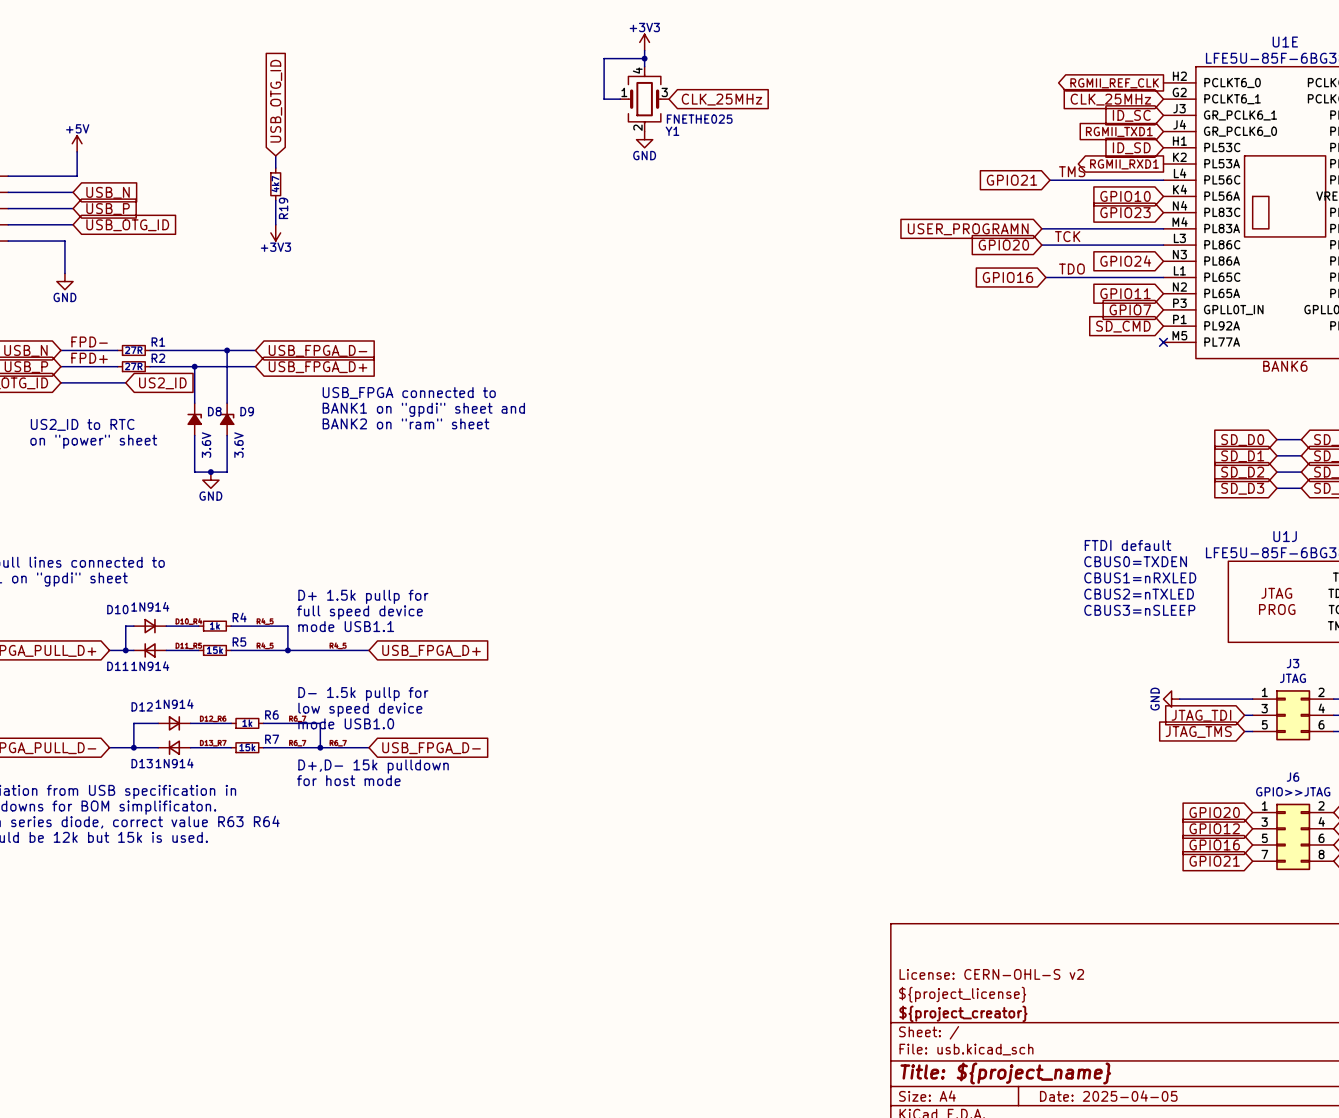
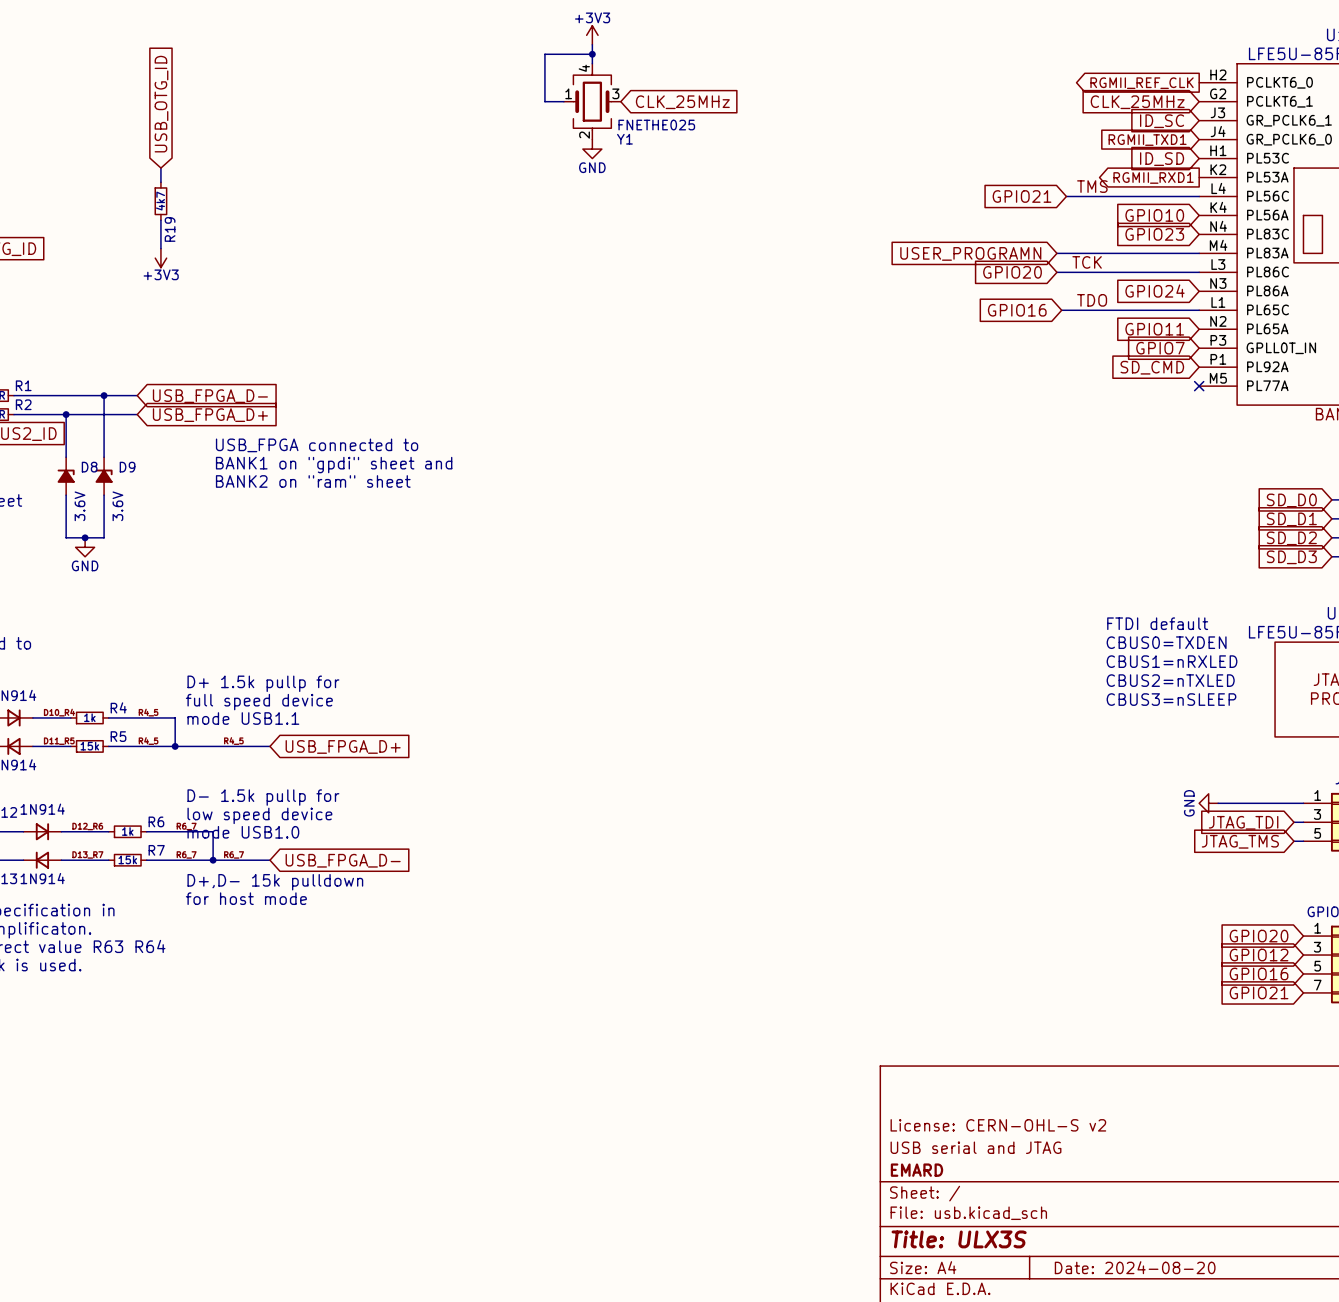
title block: ${project_license} (962, 994) -> USB serial and JTAG (975, 1147)
title block: ${project_creator} (963, 1013) -> EMARD (916, 1170)
title block: Title: ${project_name} (1005, 1073) -> Title: ULX3S (959, 1239)
title block: Date: 2025-04-05 (1108, 1096) -> Date: 2024-08-20 (1135, 1267)

